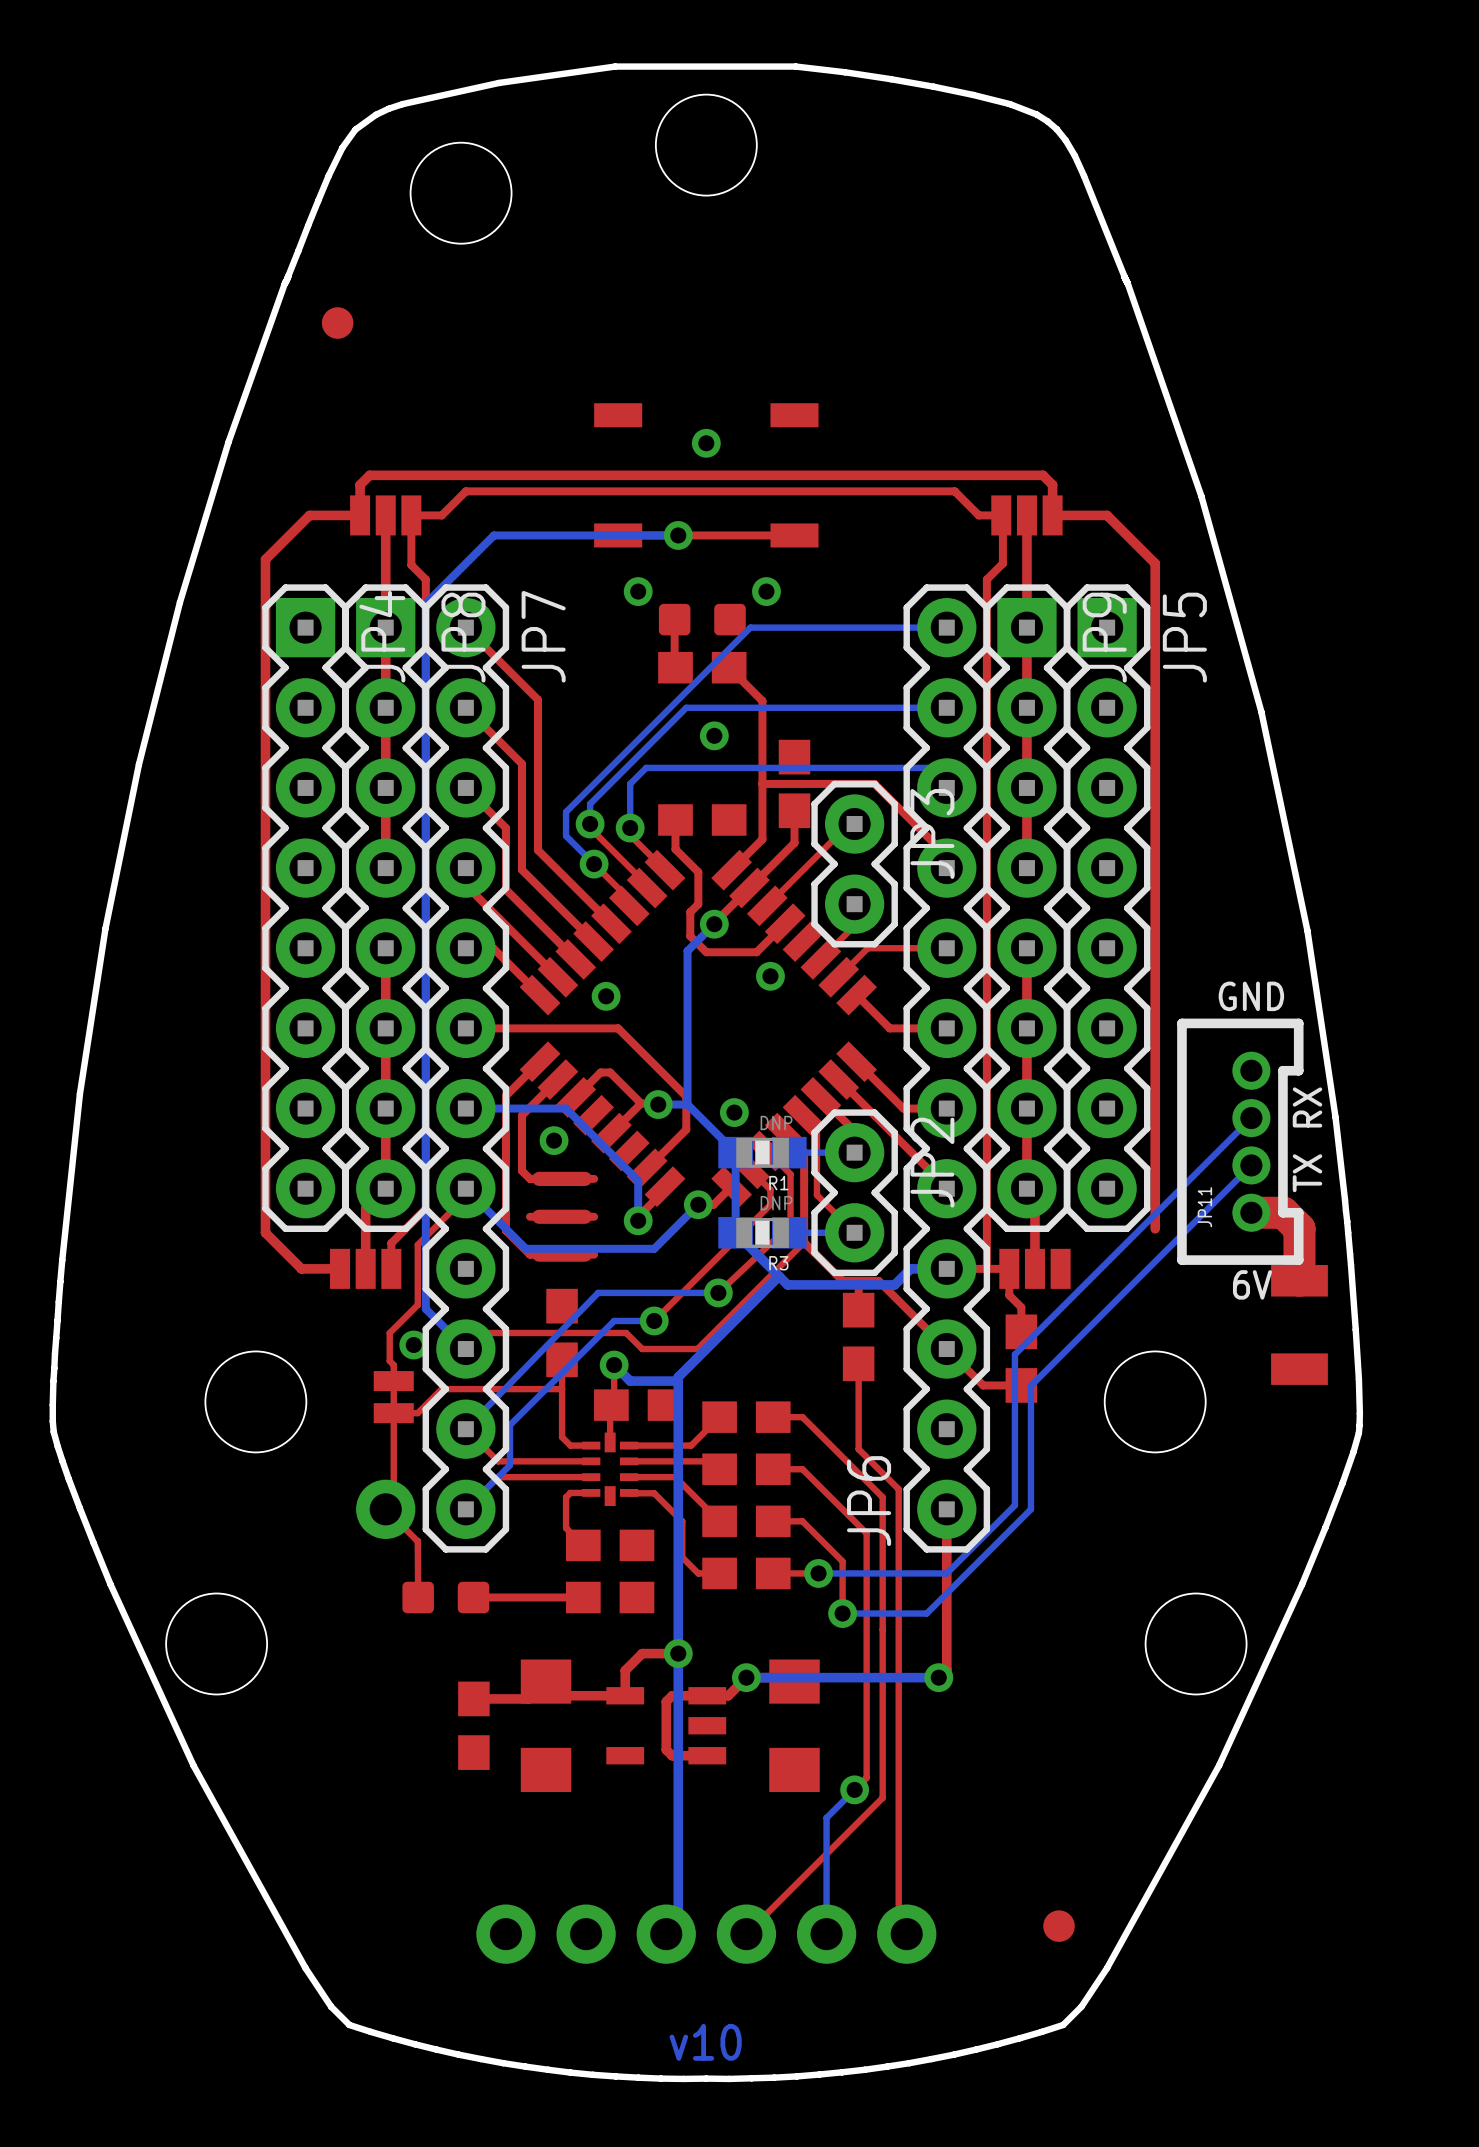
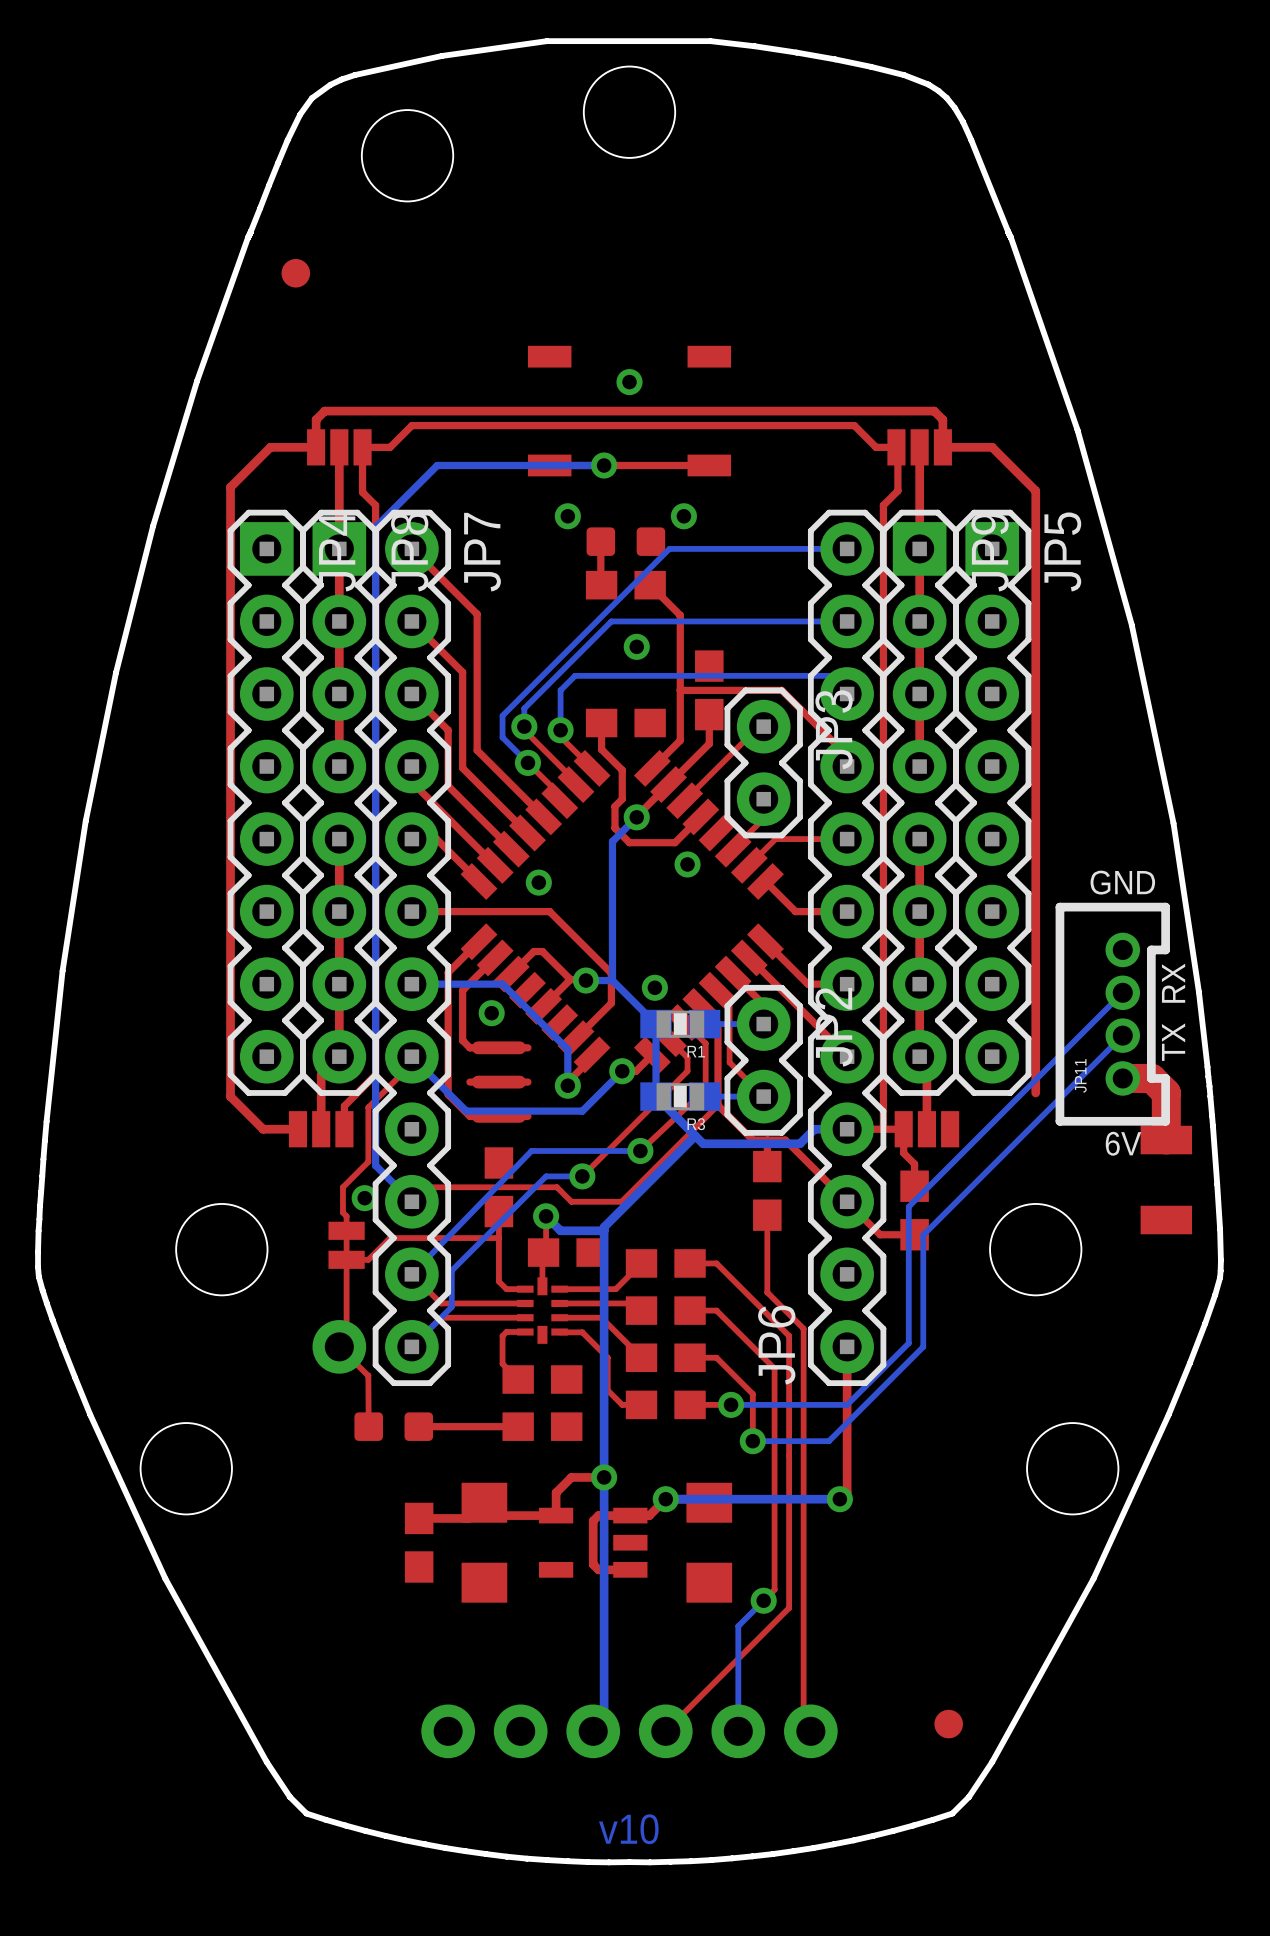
R1 value: DNP (776, 1122) -> none
R3 value: DNP (776, 1203) -> none

